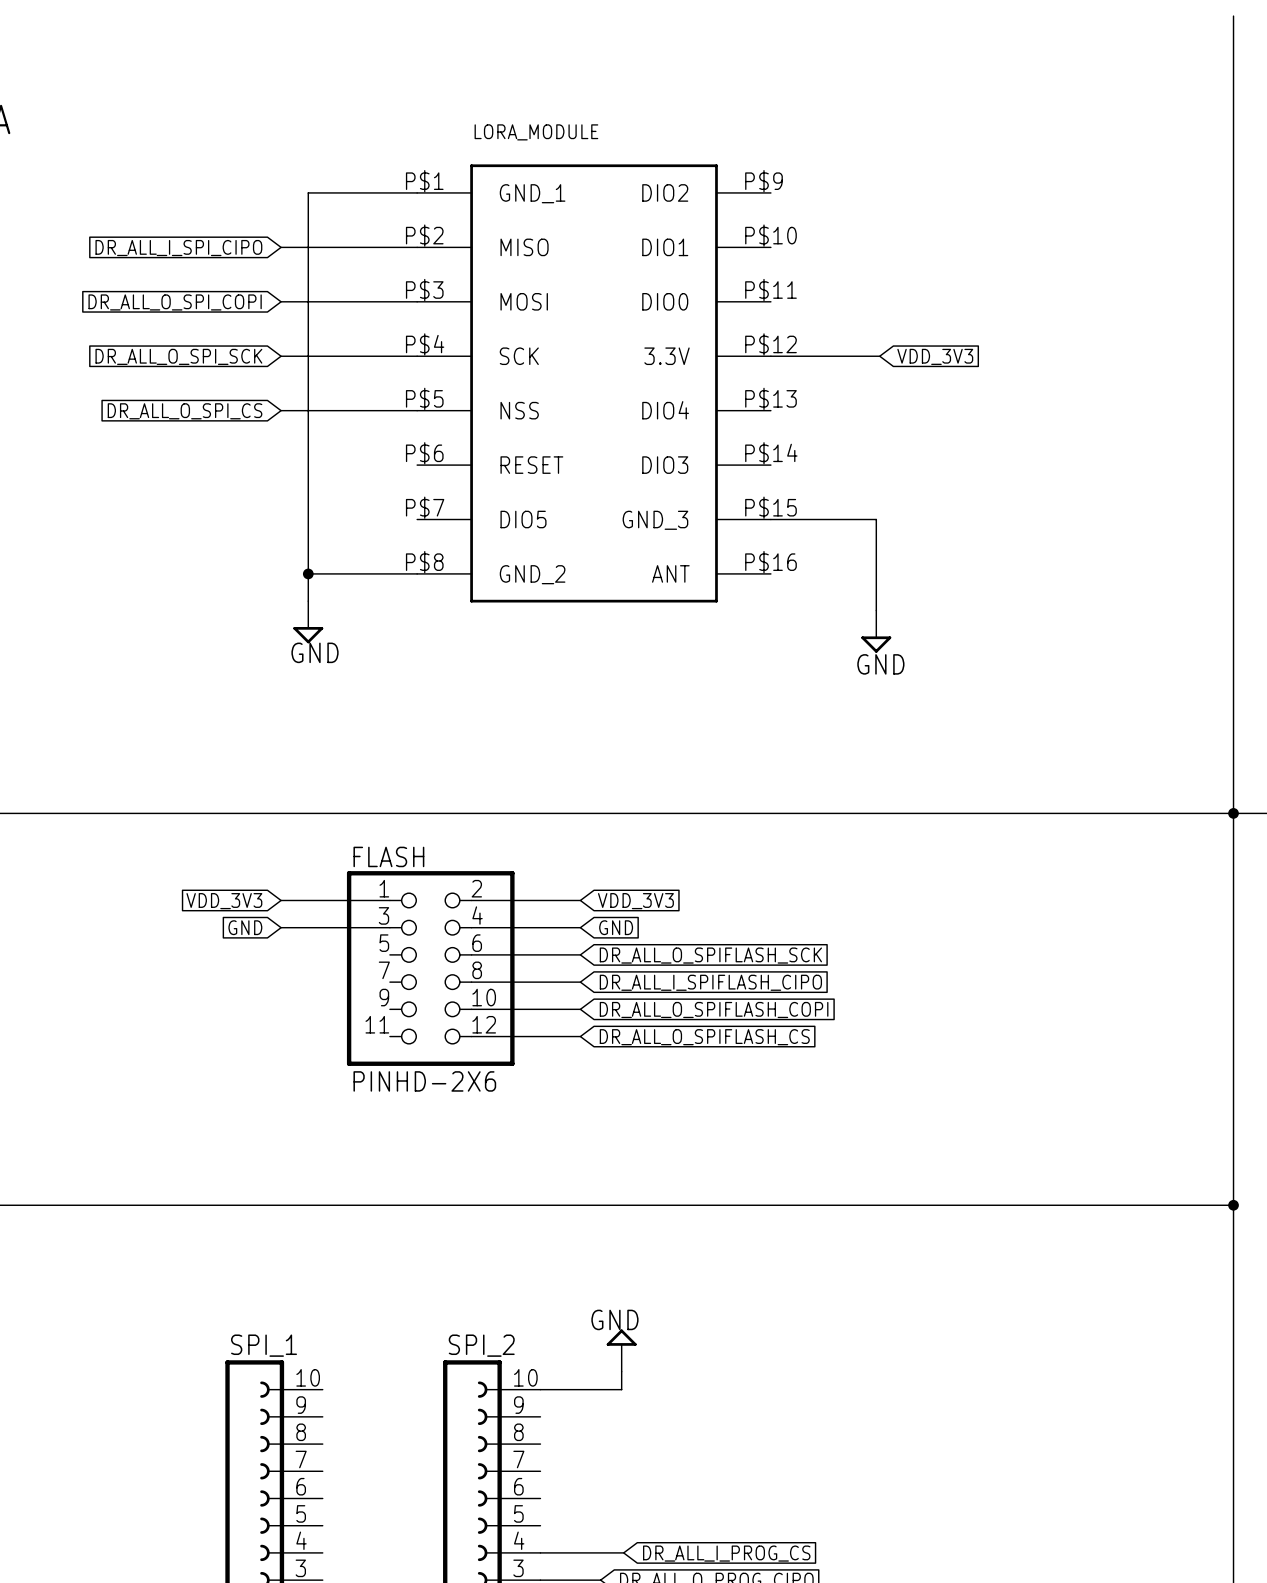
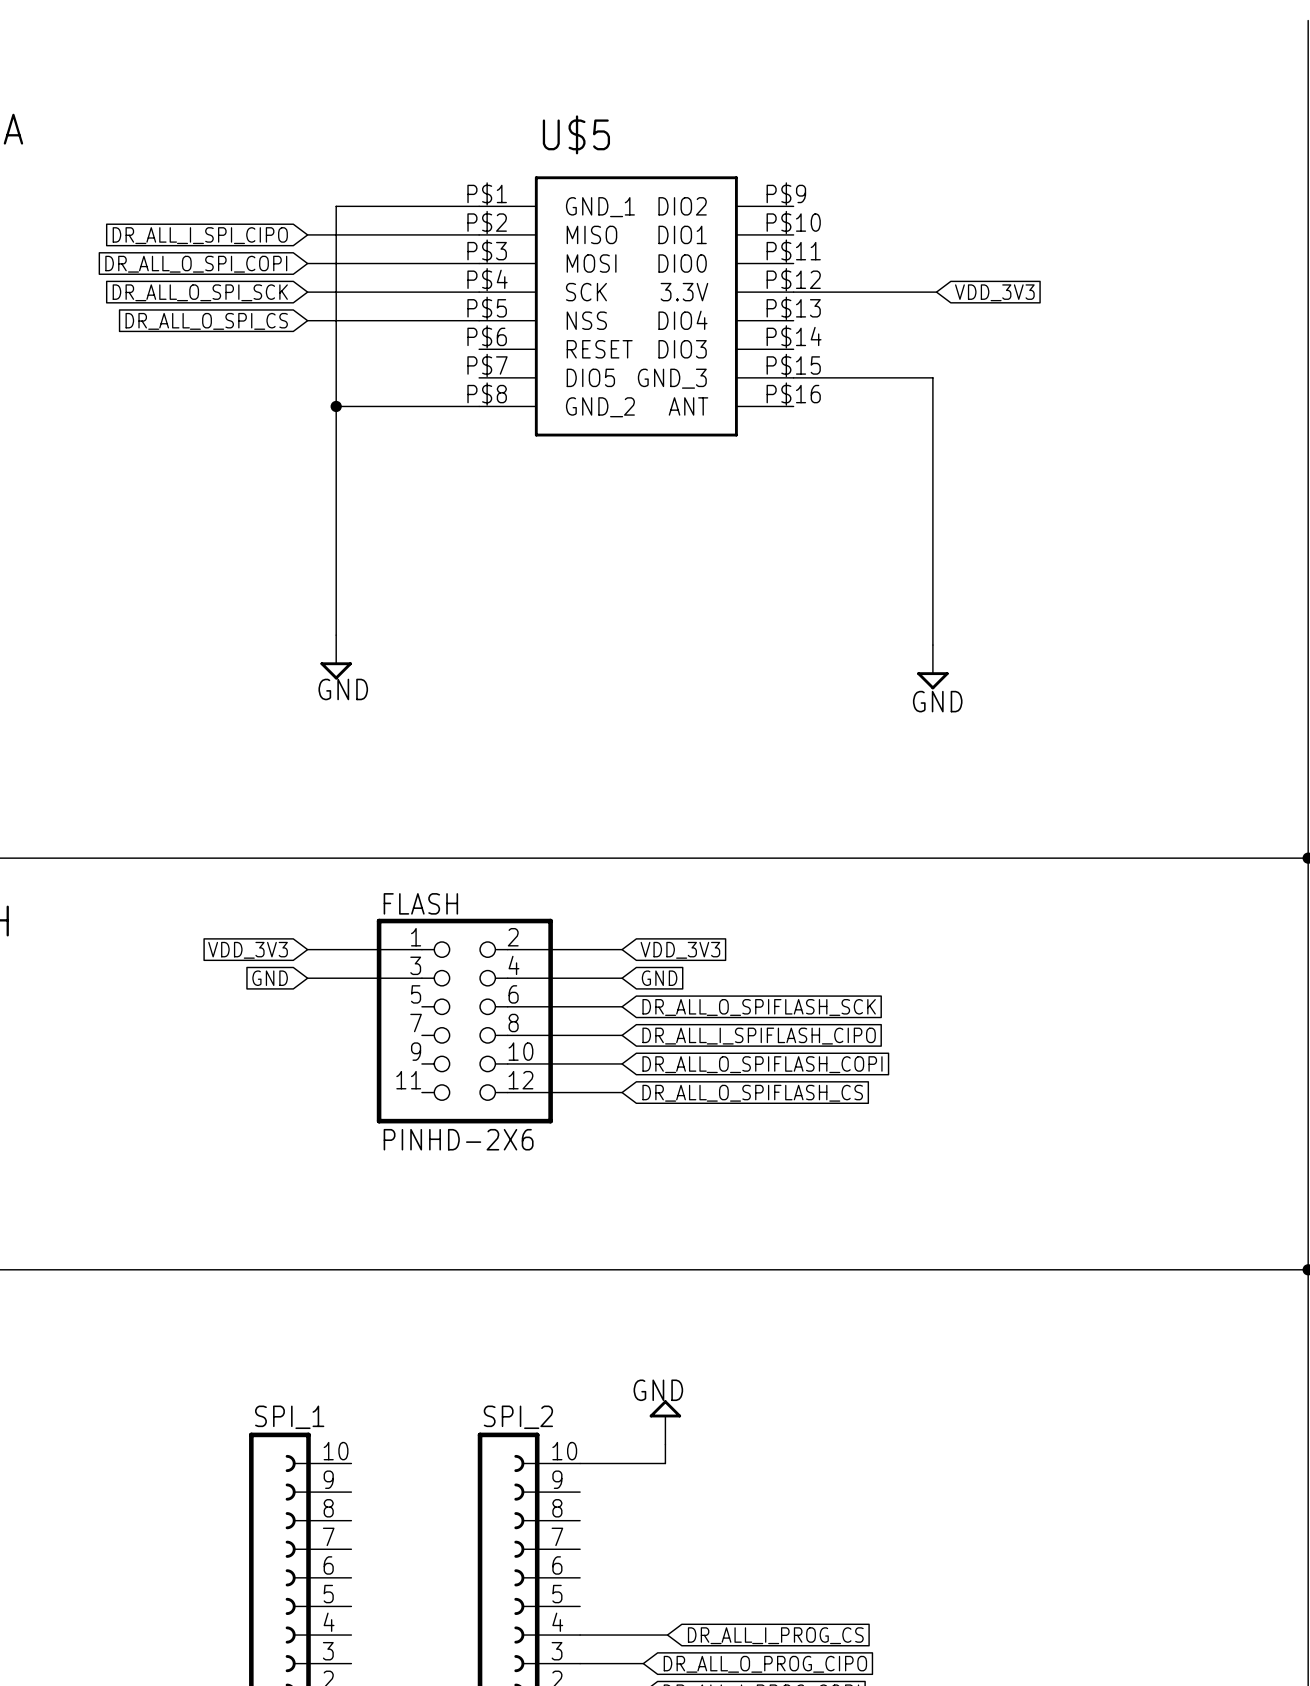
global label: none -> DR_ALL_I_SPI_CIPO (200, 235)
wire: none -> (307, 234) (479, 234)
global label: DR_ALL_I_SPI_CIPO (178, 248) -> DR_ALL_O_SPI_COPI (196, 264)
wire: none -> (307, 292) (479, 292)
wire: none -> (793, 292) (936, 292)
U$5: none -> (636, 306)
global label: DR_ALL_O_SPI_COPI (175, 302) -> DR_ALL_O_SPI_CS (206, 321)
global label position: DR_ALL_O_SPI_SCK (178, 356) -> DR_ALL_O_SPI_SCK (200, 292)
wire: (281, 356) (417, 356) -> (336, 406) (479, 406)
wire: (876, 356) (879, 356) -> (932, 377) (932, 549)
global label position: VDD_3V3 (935, 356) -> VDD_3V3 (994, 292)
junction: none -> (336, 406)
LORA_MODULE: (594, 383) -> none
wire: (281, 410) (417, 410) -> none
global label: DR_ALL_O_SPI_CS (185, 411) -> none
wire: (770, 519) (876, 519) -> none
wire: (308, 573) (417, 573) -> none
junction: (308, 573) -> none

